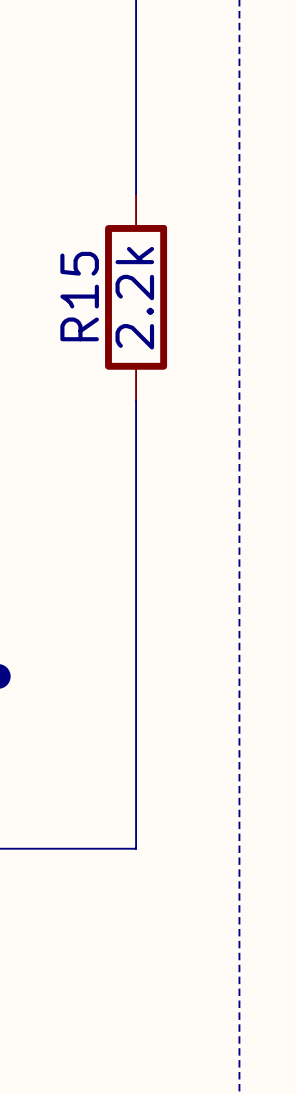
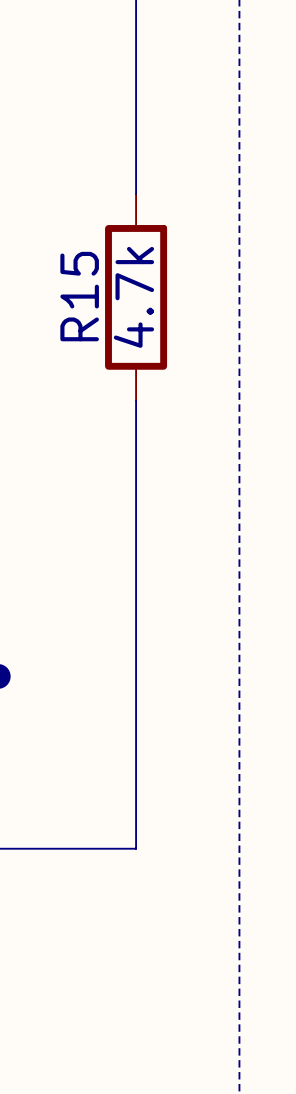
R15 value: 2.2k (134, 298) -> 4.7k (133, 297)

